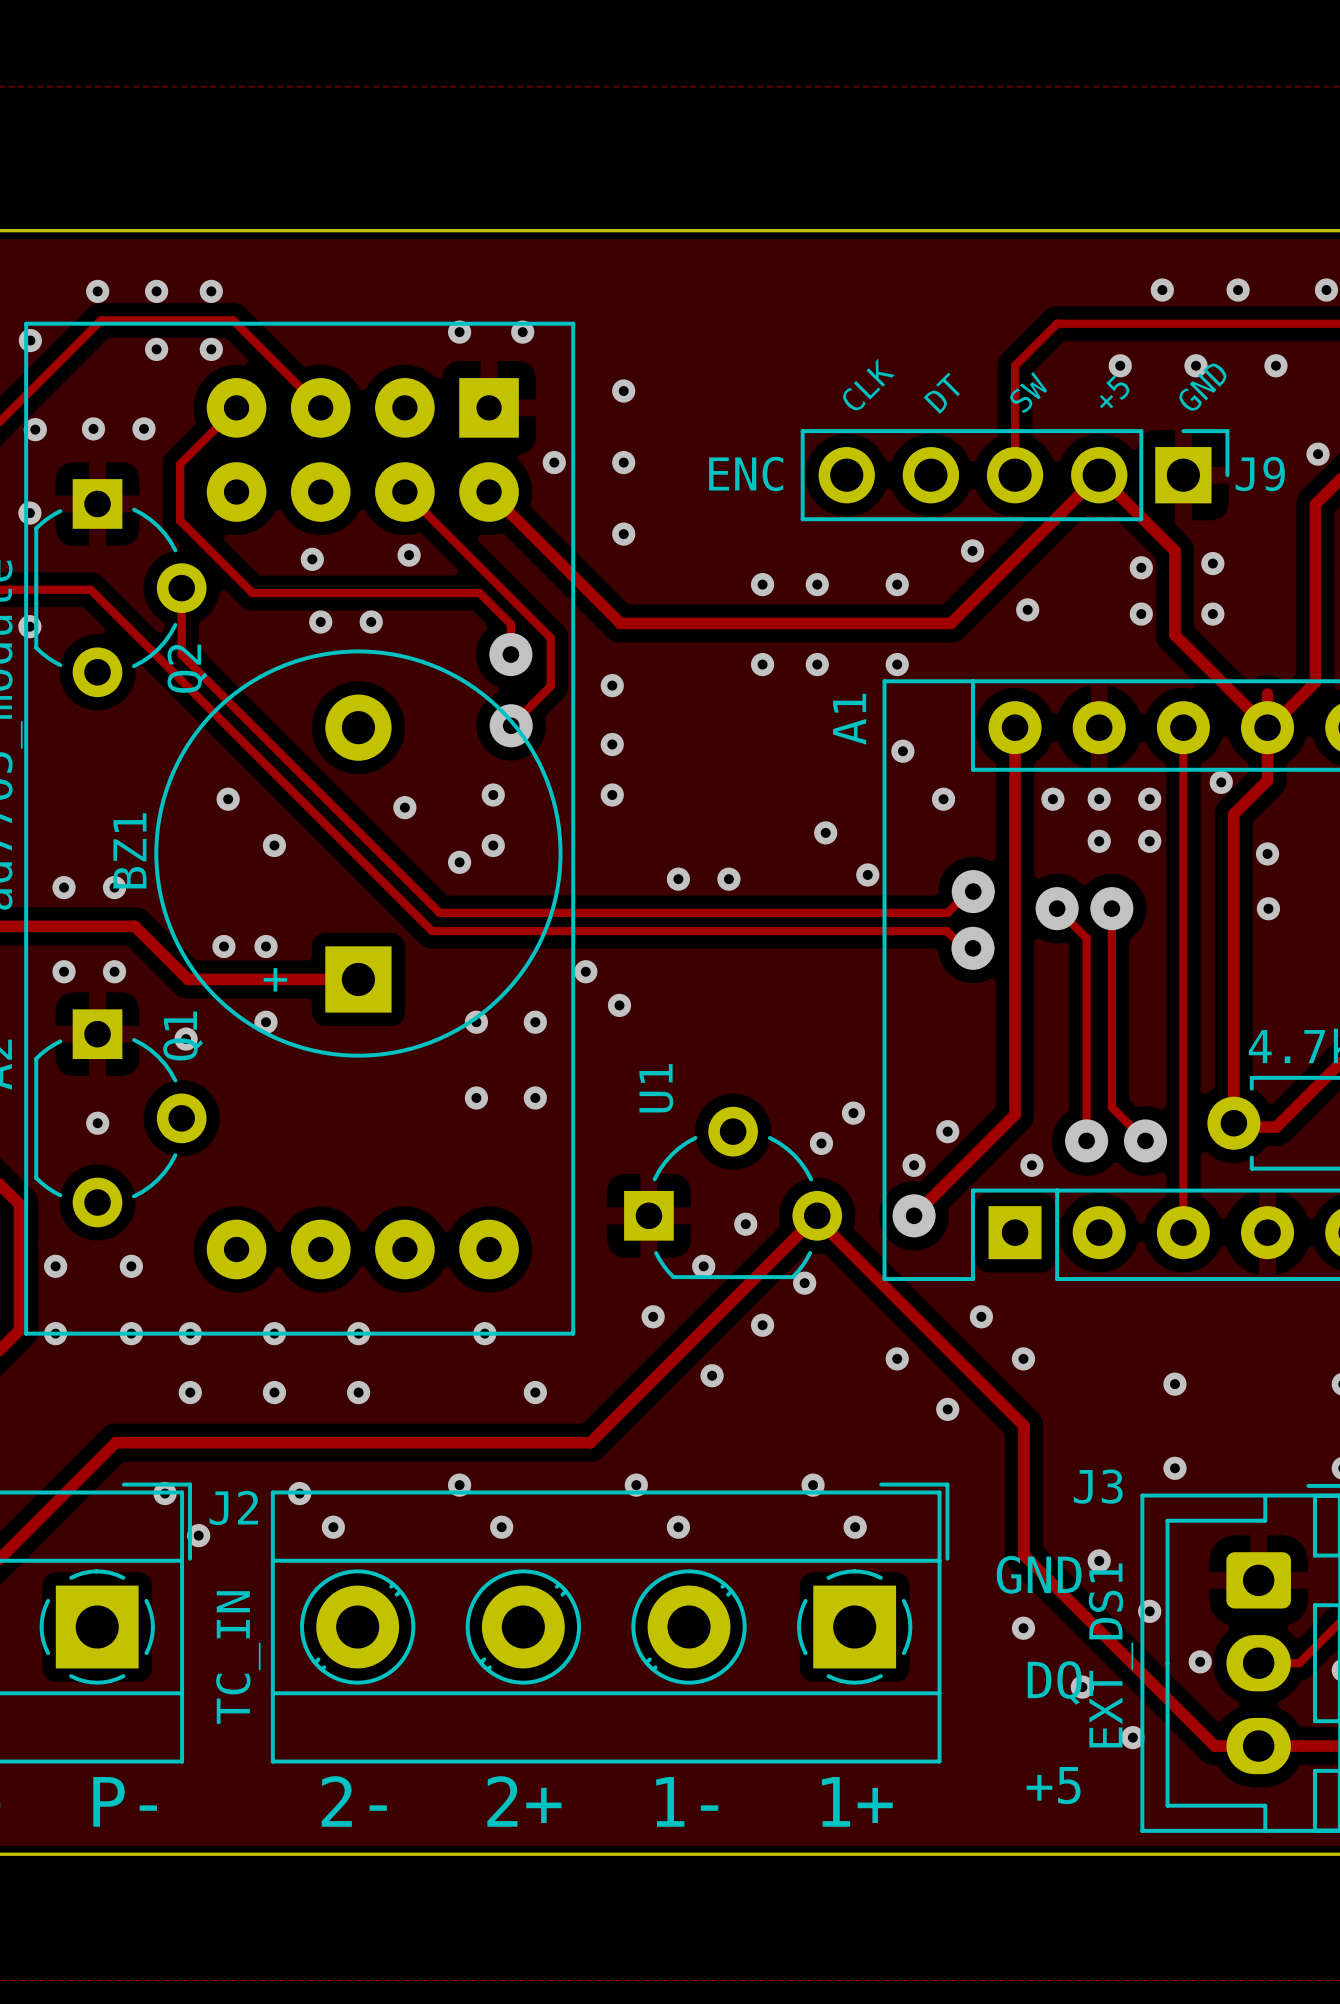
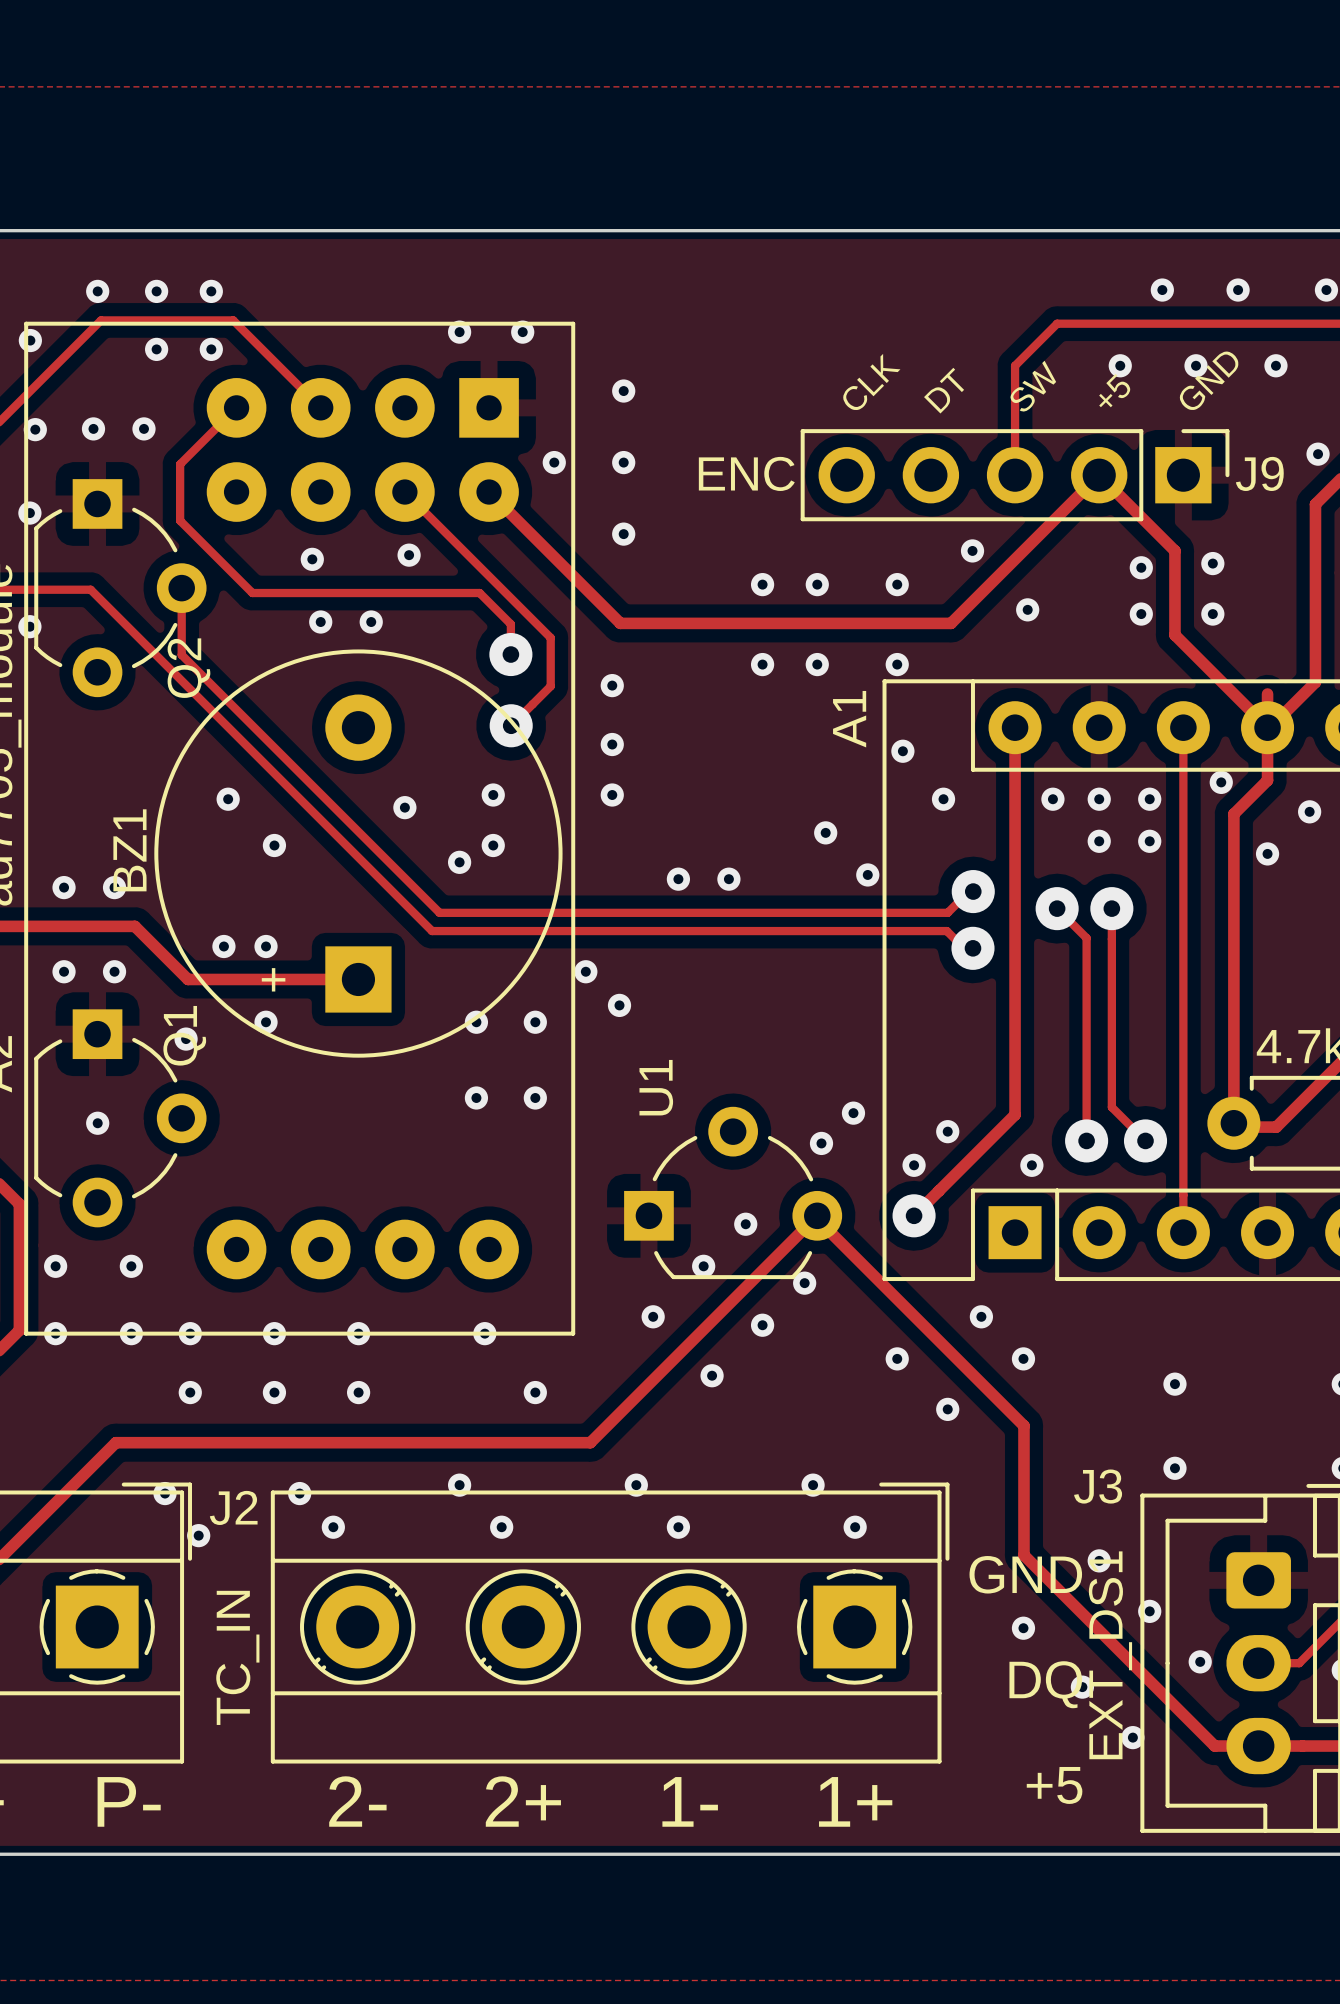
via: none -> (1309, 811)
via: (1268, 908) -> none

